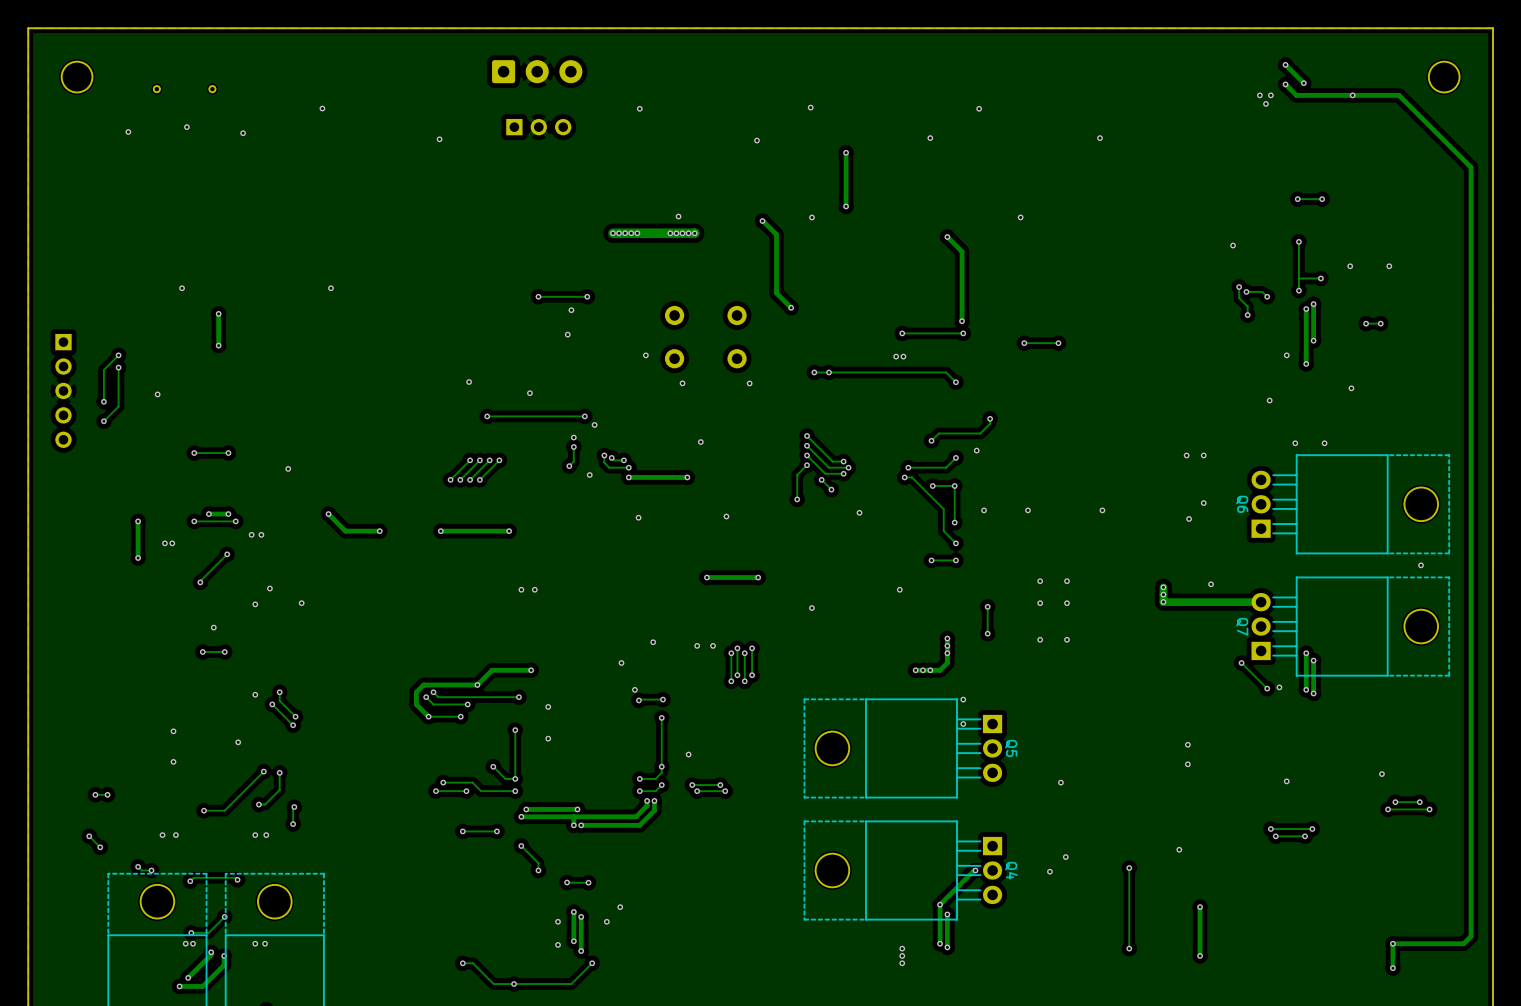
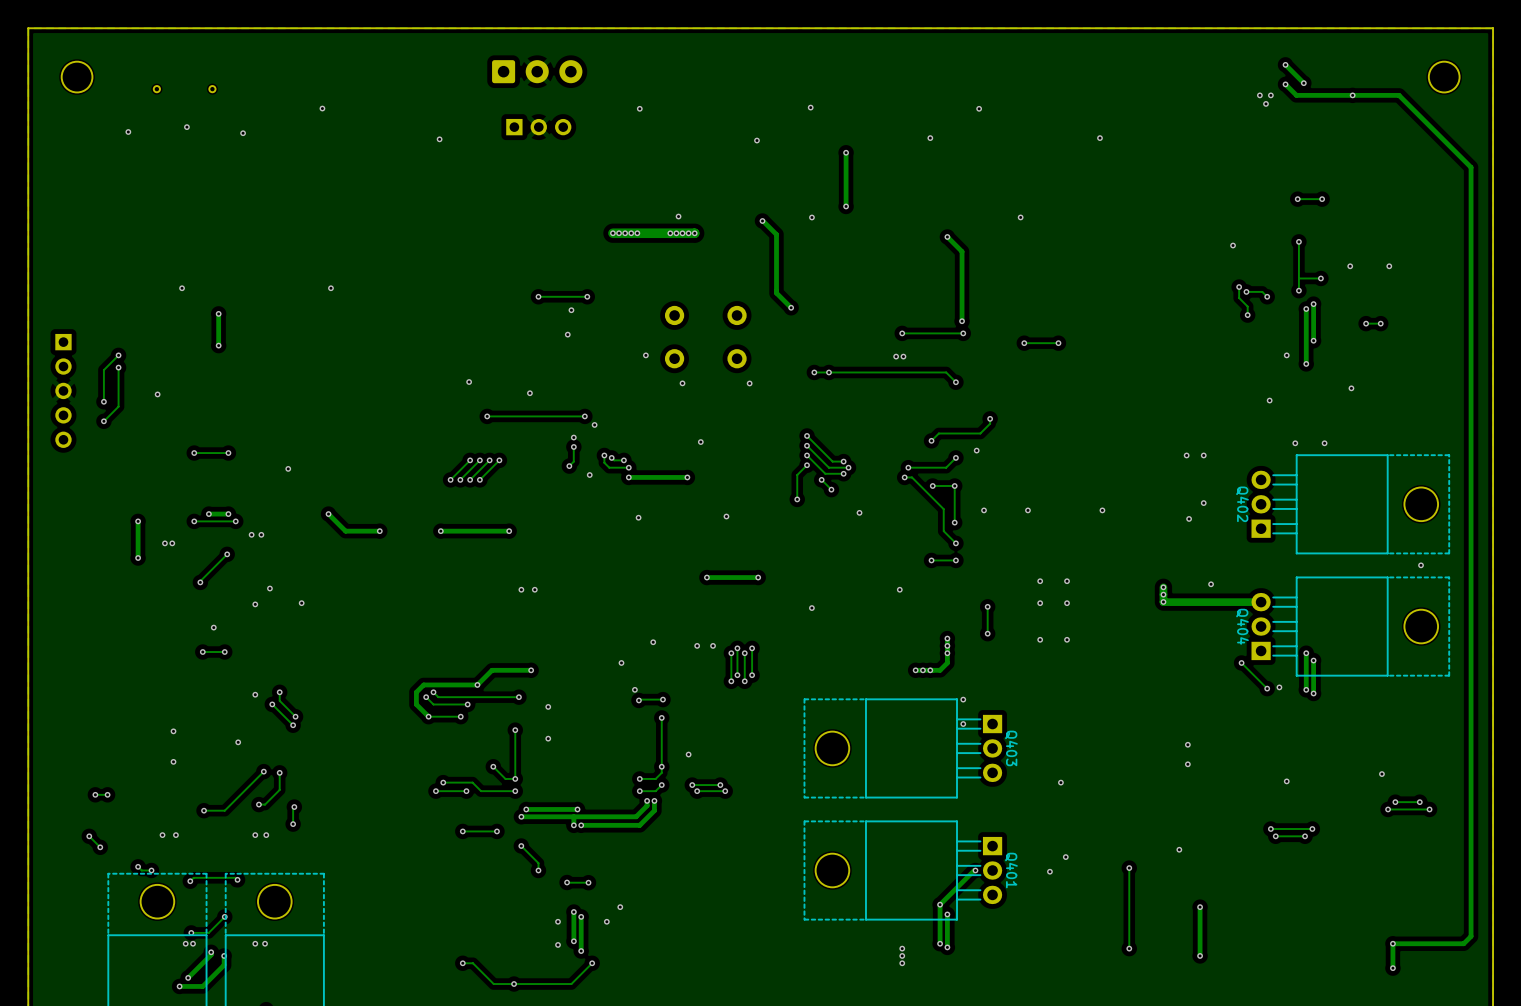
Q6 name: Q6 (1242, 504) -> Q402 (1242, 504)
Q7 name: Q7 (1242, 626) -> Q404 (1242, 626)
Q5 name: Q5 (1011, 748) -> Q403 (1011, 748)
Q4 name: Q4 (1011, 870) -> Q401 (1011, 870)

